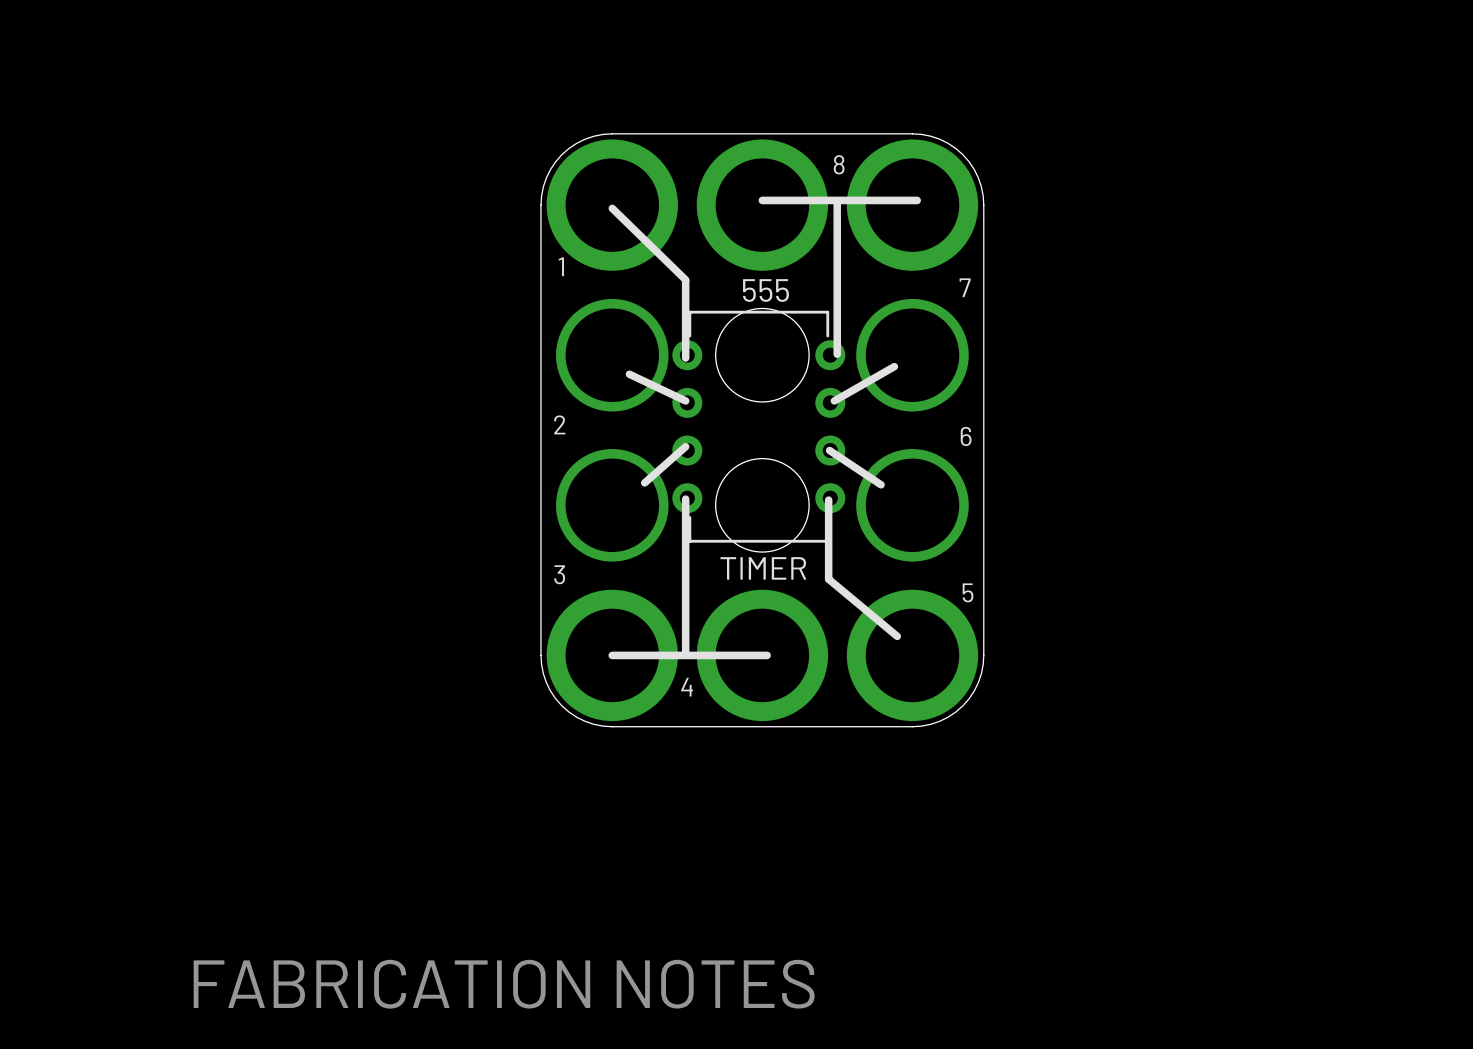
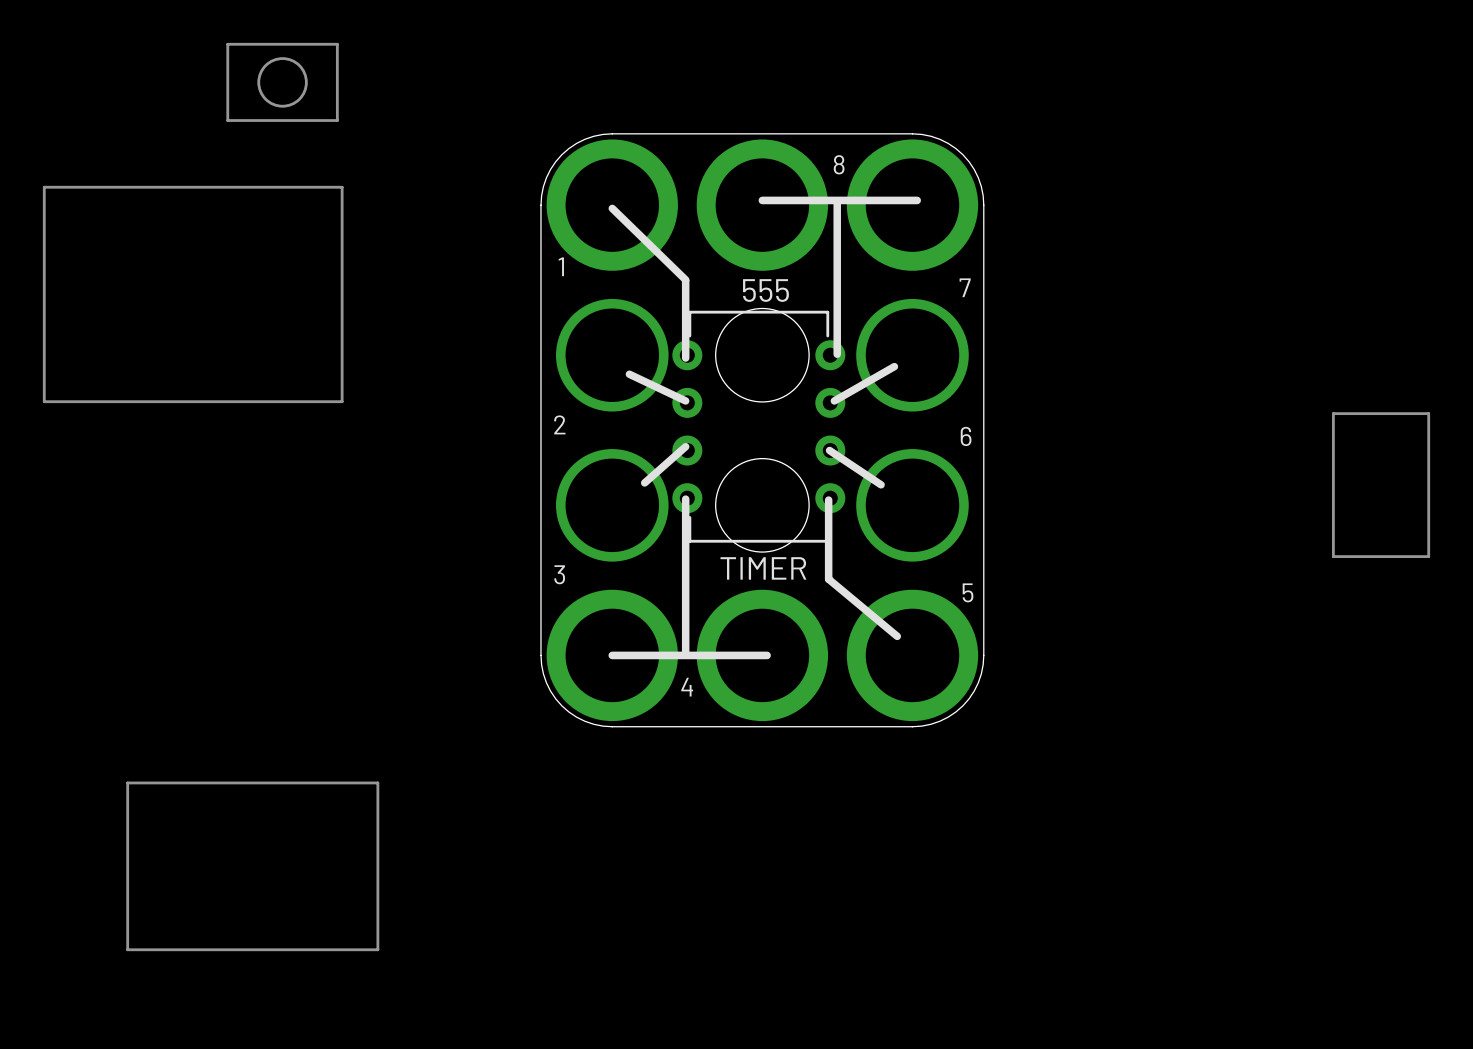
line: none -> (227, 44) (227, 120) (337, 120) (337, 44) (227, 44)
drawing: none -> [257, 57, 308, 108]
line: none -> (44, 187) (44, 401) (342, 401) (342, 187) (44, 187)
line: none -> (1333, 413) (1333, 556) (1428, 556) (1428, 413) (1333, 413)
line: none -> (127, 782) (127, 949) (377, 949) (377, 782) (127, 782)
text: FABRICATION NOTES (504, 984) -> none

